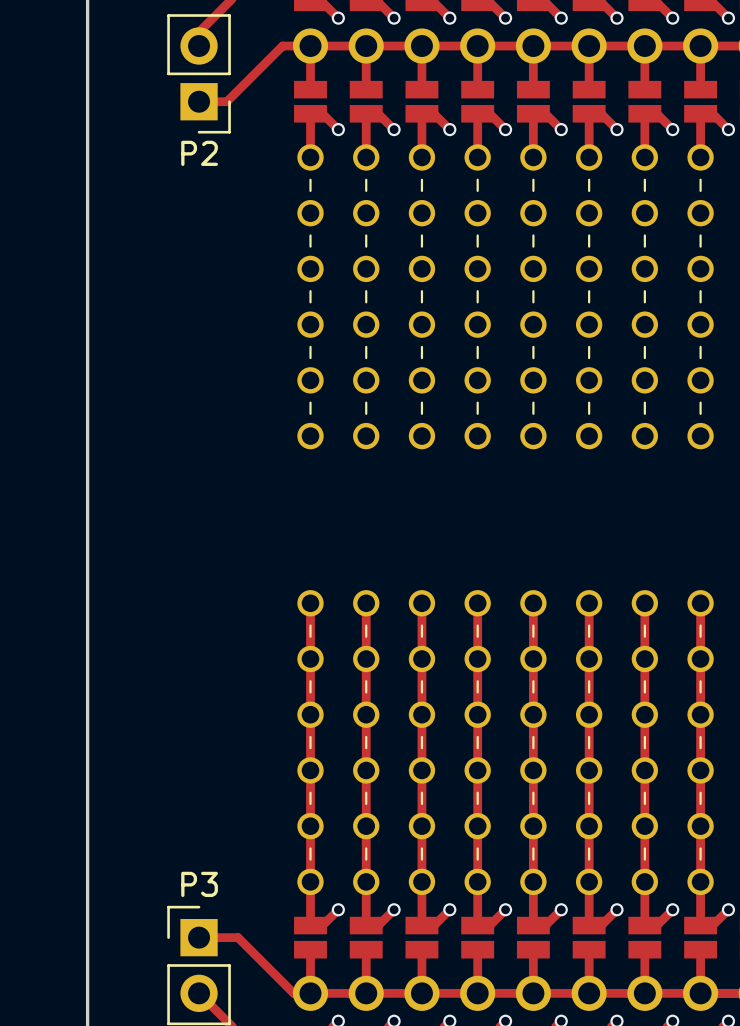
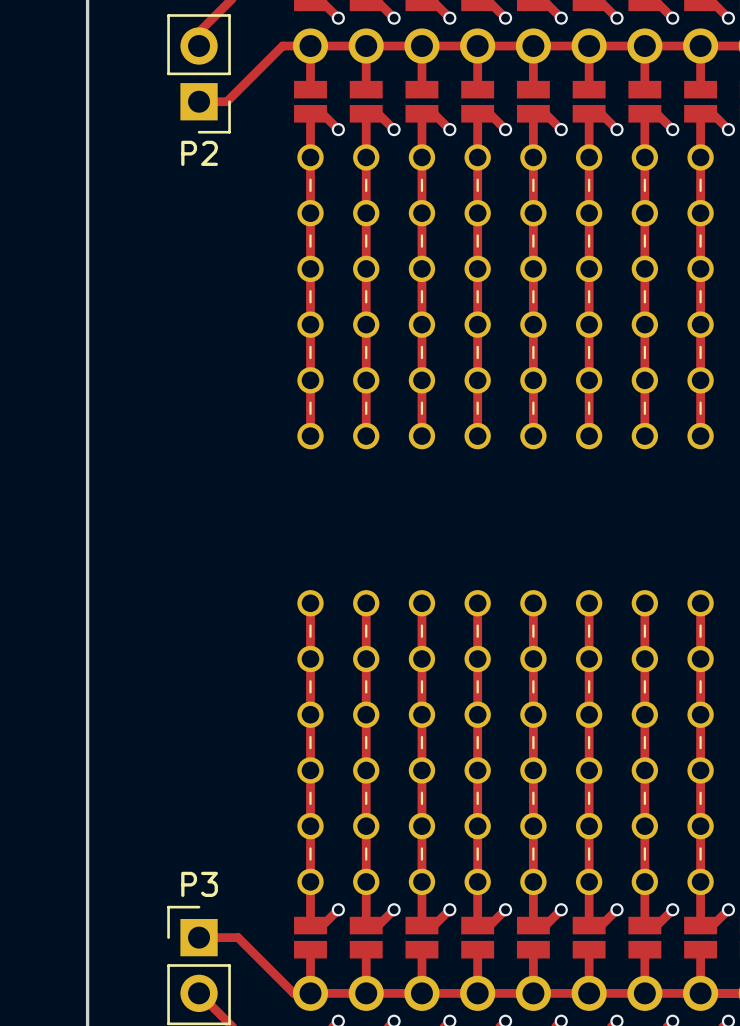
track: none -> (310, 157) (310, 436)
track: none -> (366, 157) (366, 436)
track: none -> (421, 157) (421, 436)
track: none -> (477, 157) (477, 436)
track: none -> (533, 157) (533, 436)
track: none -> (589, 157) (589, 436)
track: none -> (644, 157) (644, 436)
track: none -> (700, 157) (700, 436)

